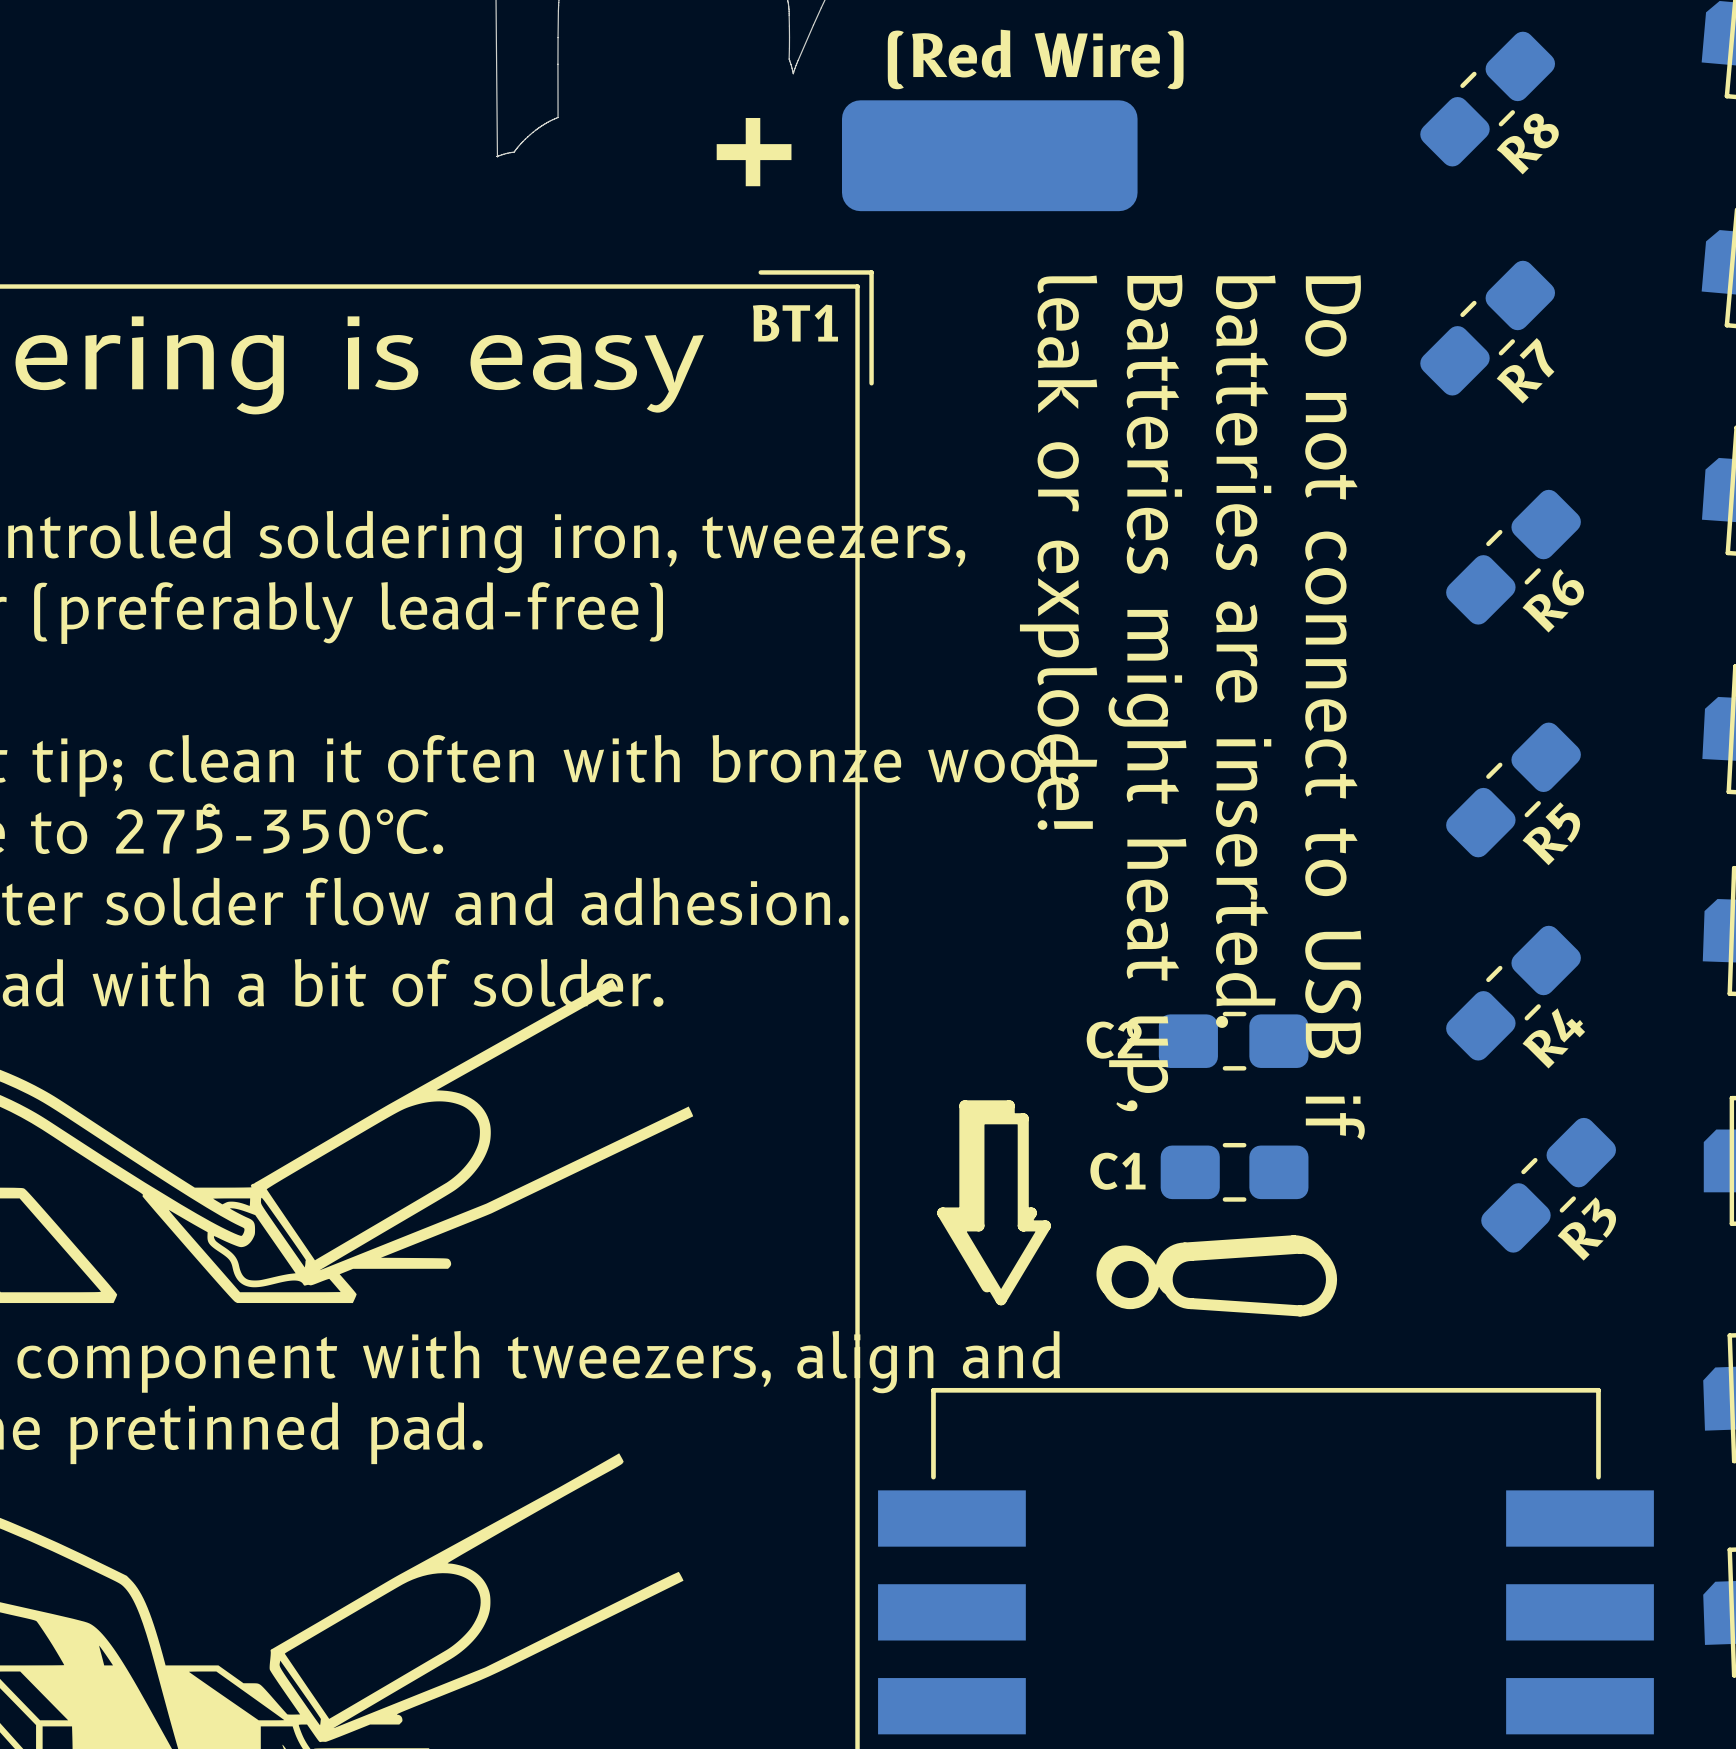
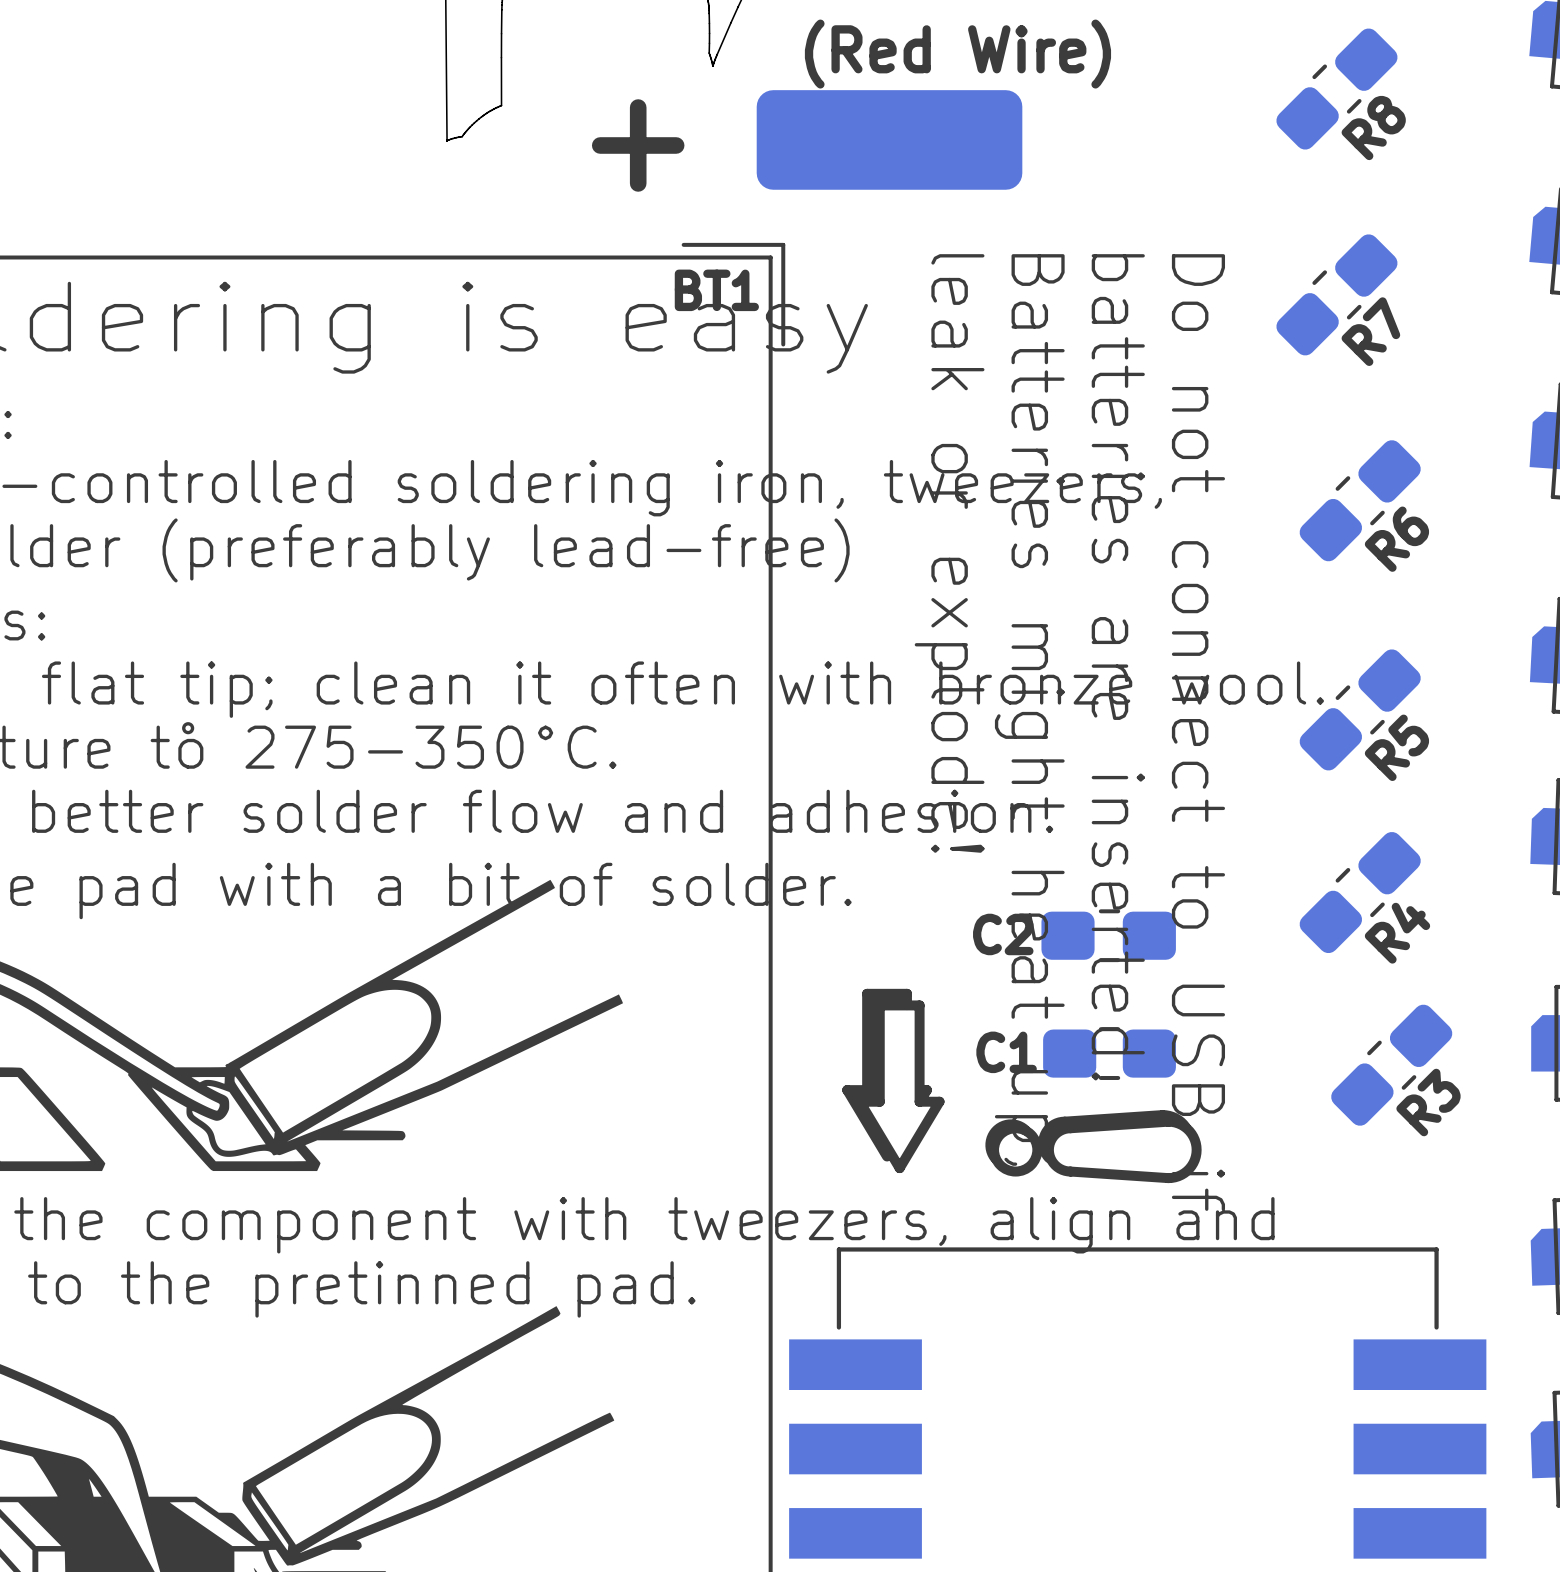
BT1 text position: + (754, 152) -> + (638, 145)

